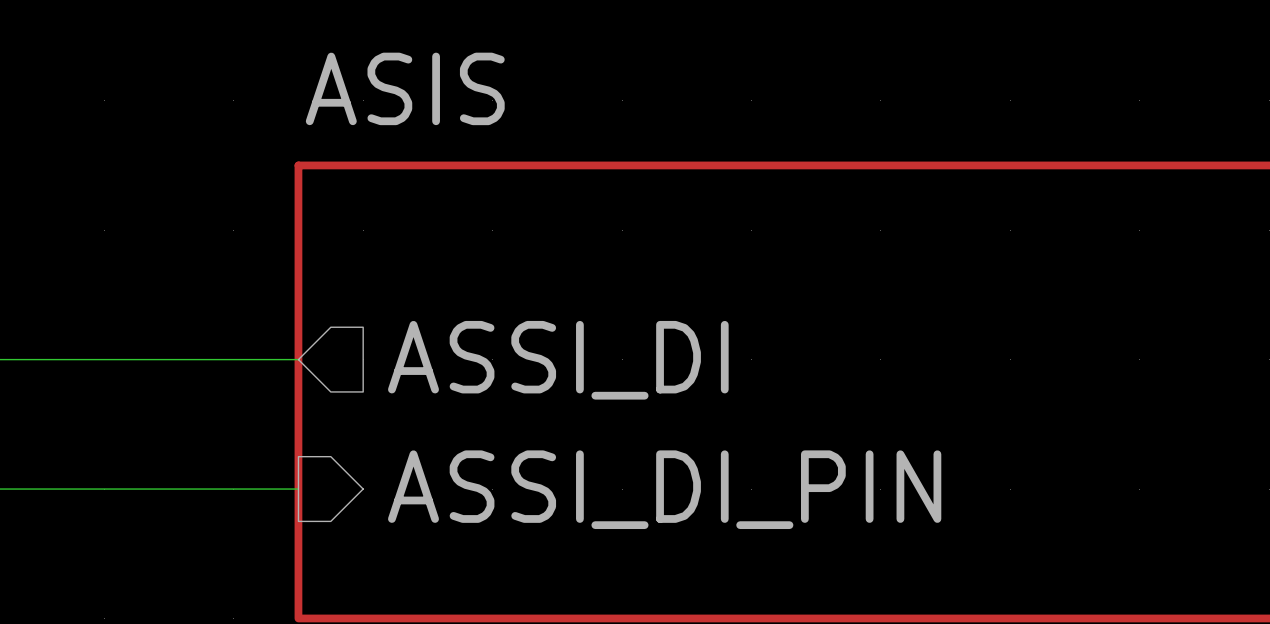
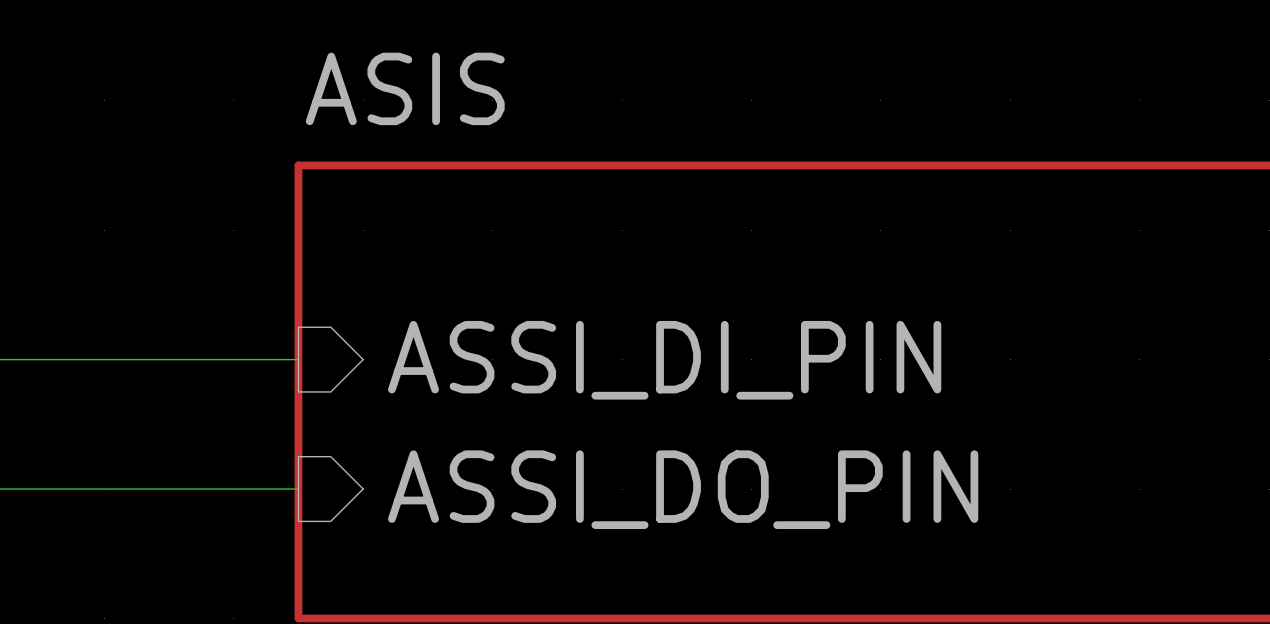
sheet pin shape: output (558, 360) -> input (664, 360)
sheet pin: ASSI_DI (558, 360) -> ASSI_DI_PIN (664, 360)
sheet pin: ASSI_DI_PIN (664, 489) -> ASSI_DO_PIN (683, 489)

